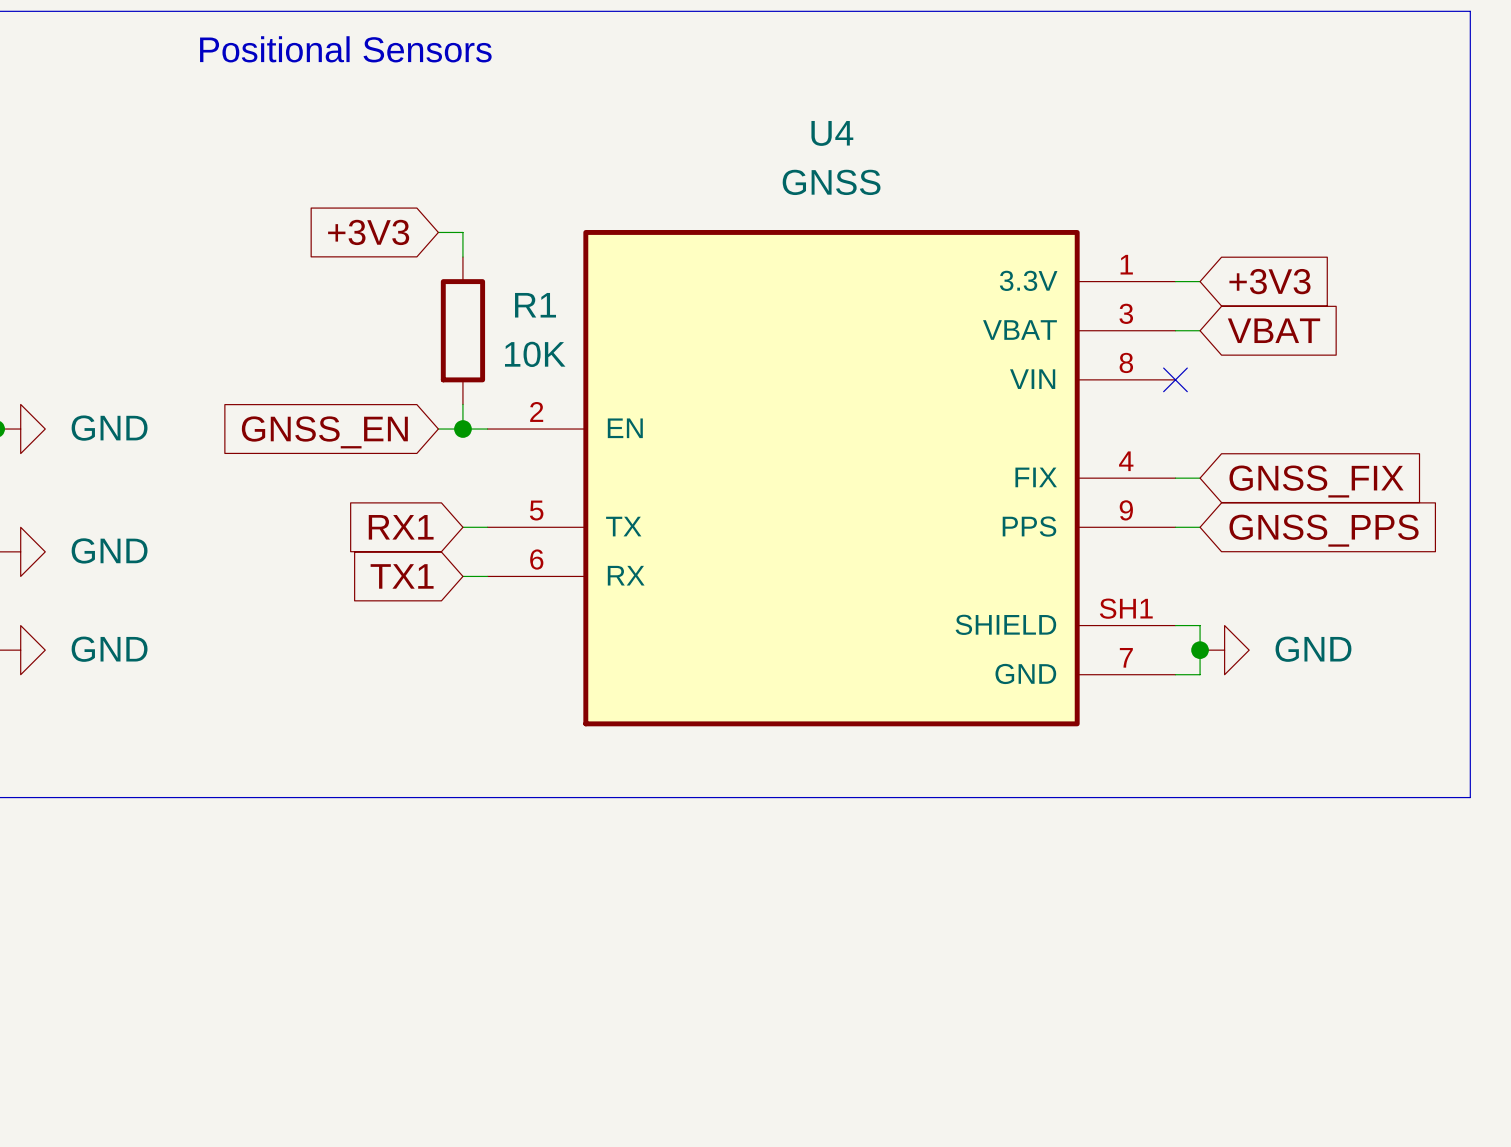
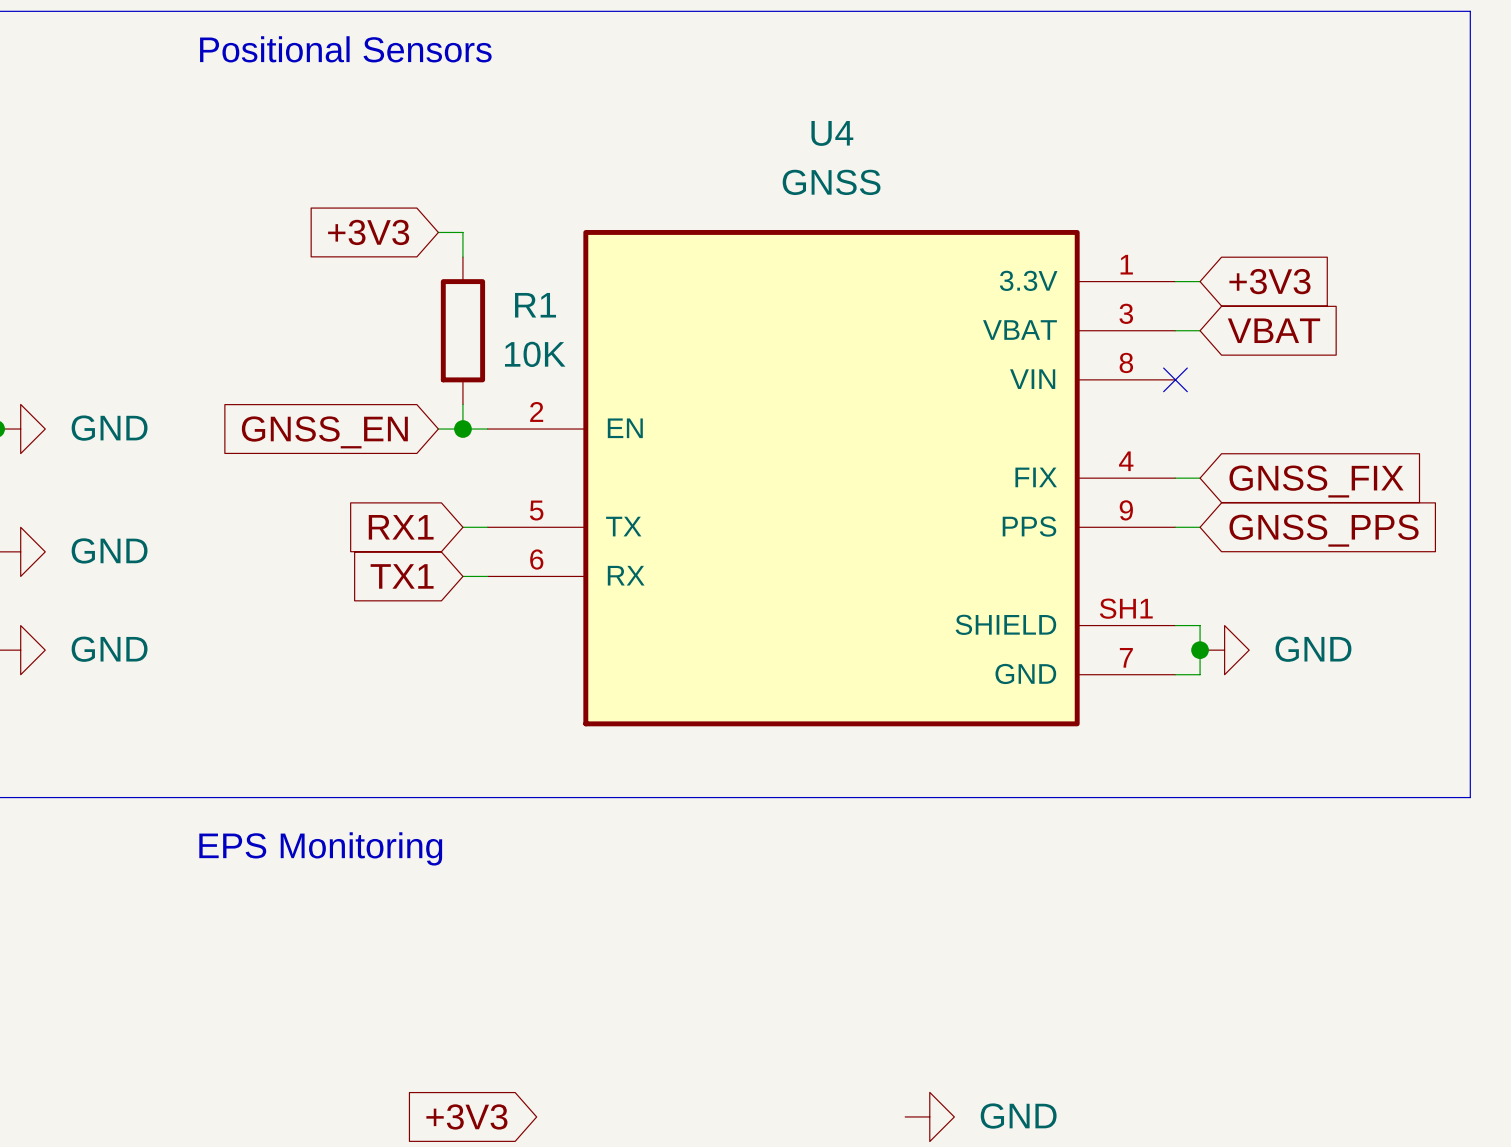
text: none -> EPS Monitoring (320, 848)
global label: none -> +3V3 (466, 1116)
power symbol: none -> GND (929, 1116)

